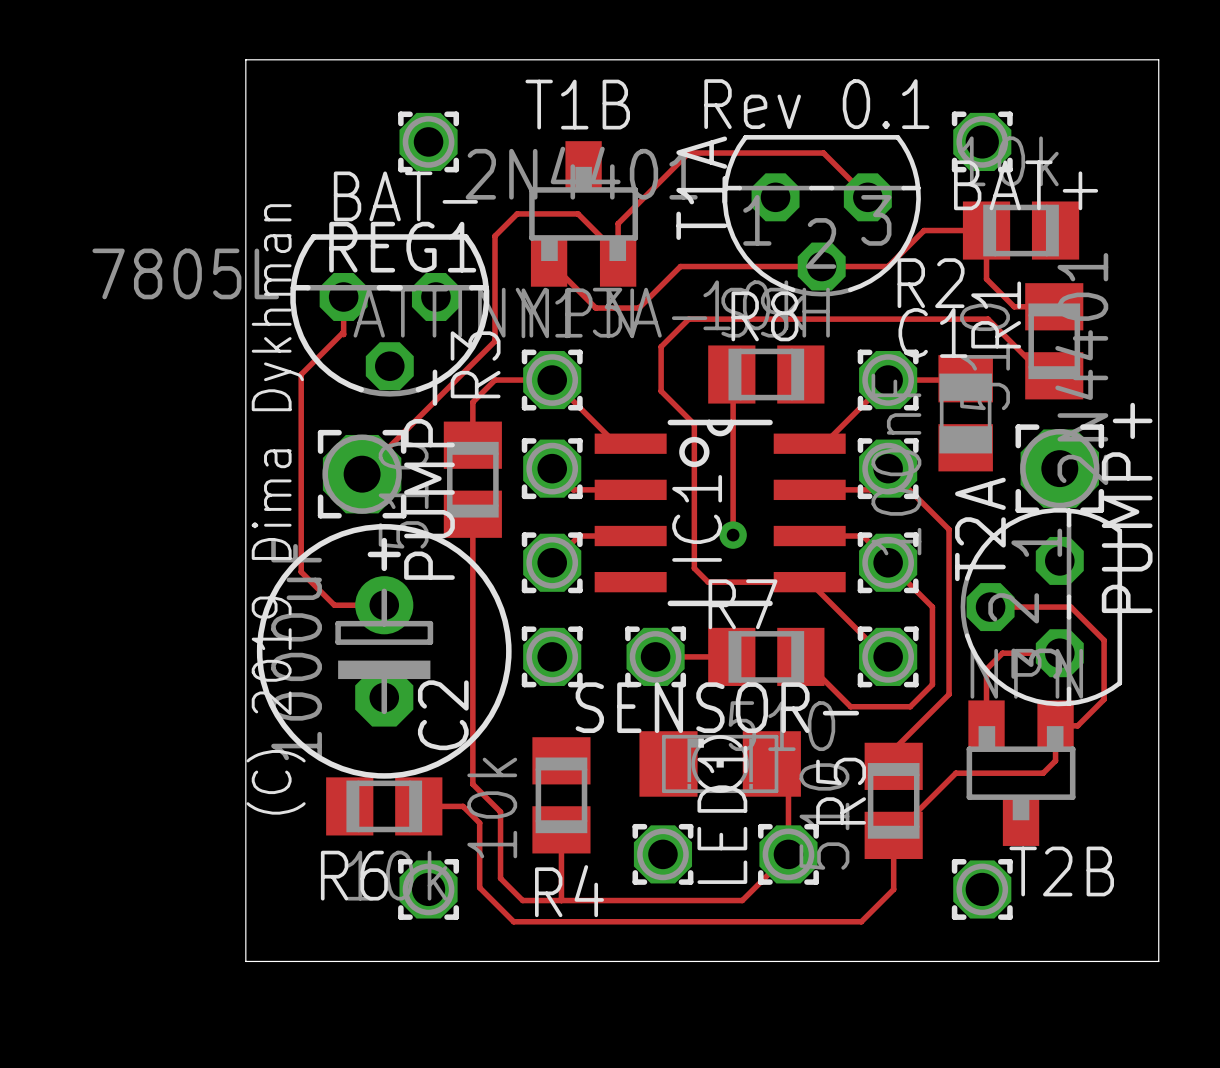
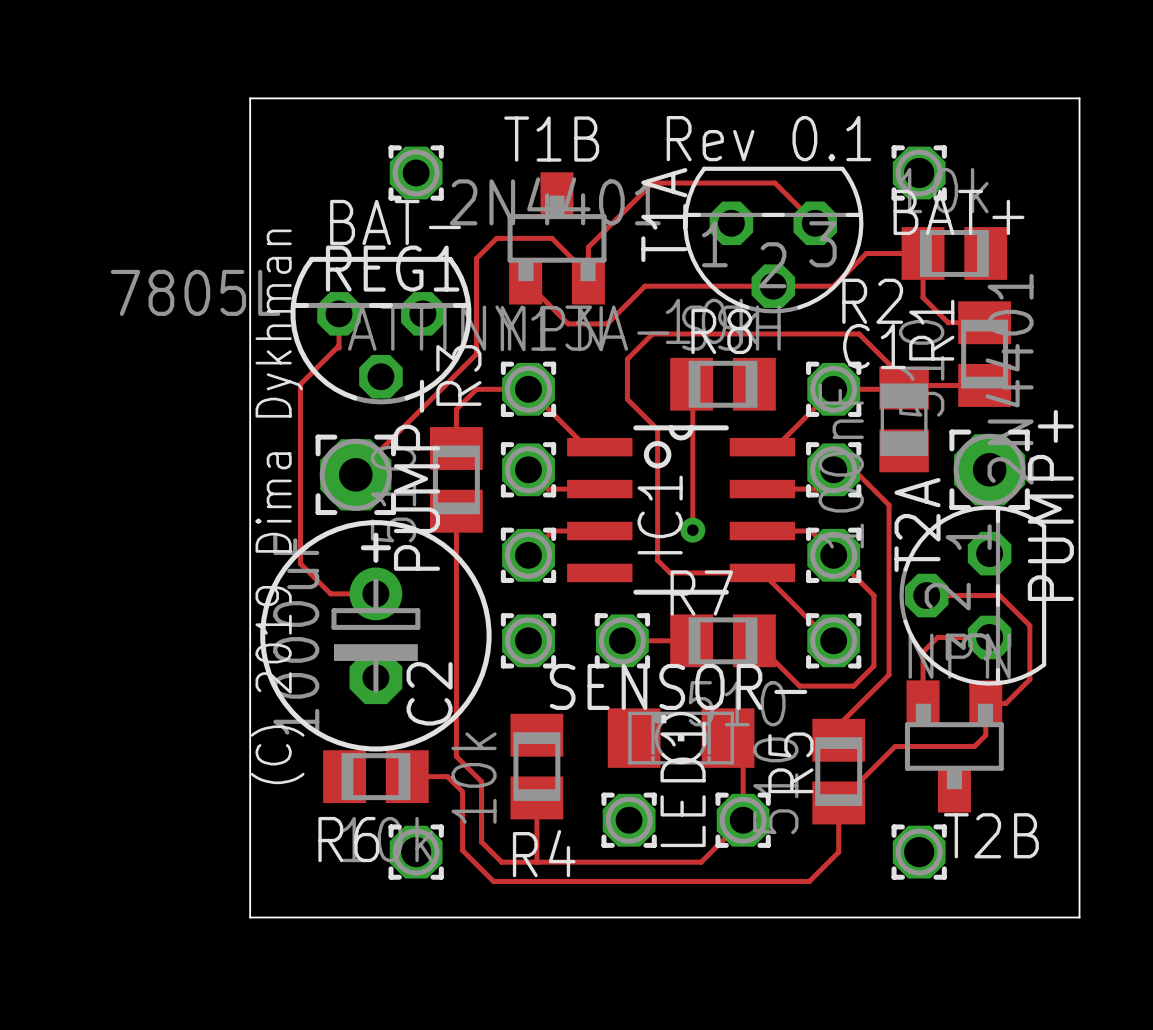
track: (916, 319) (988, 319) (1044, 375) -> (859, 333) (910, 385) (975, 385)
track: (888, 468) (949, 529) -> (833, 469) (854, 470) (889, 505) (889, 525)

